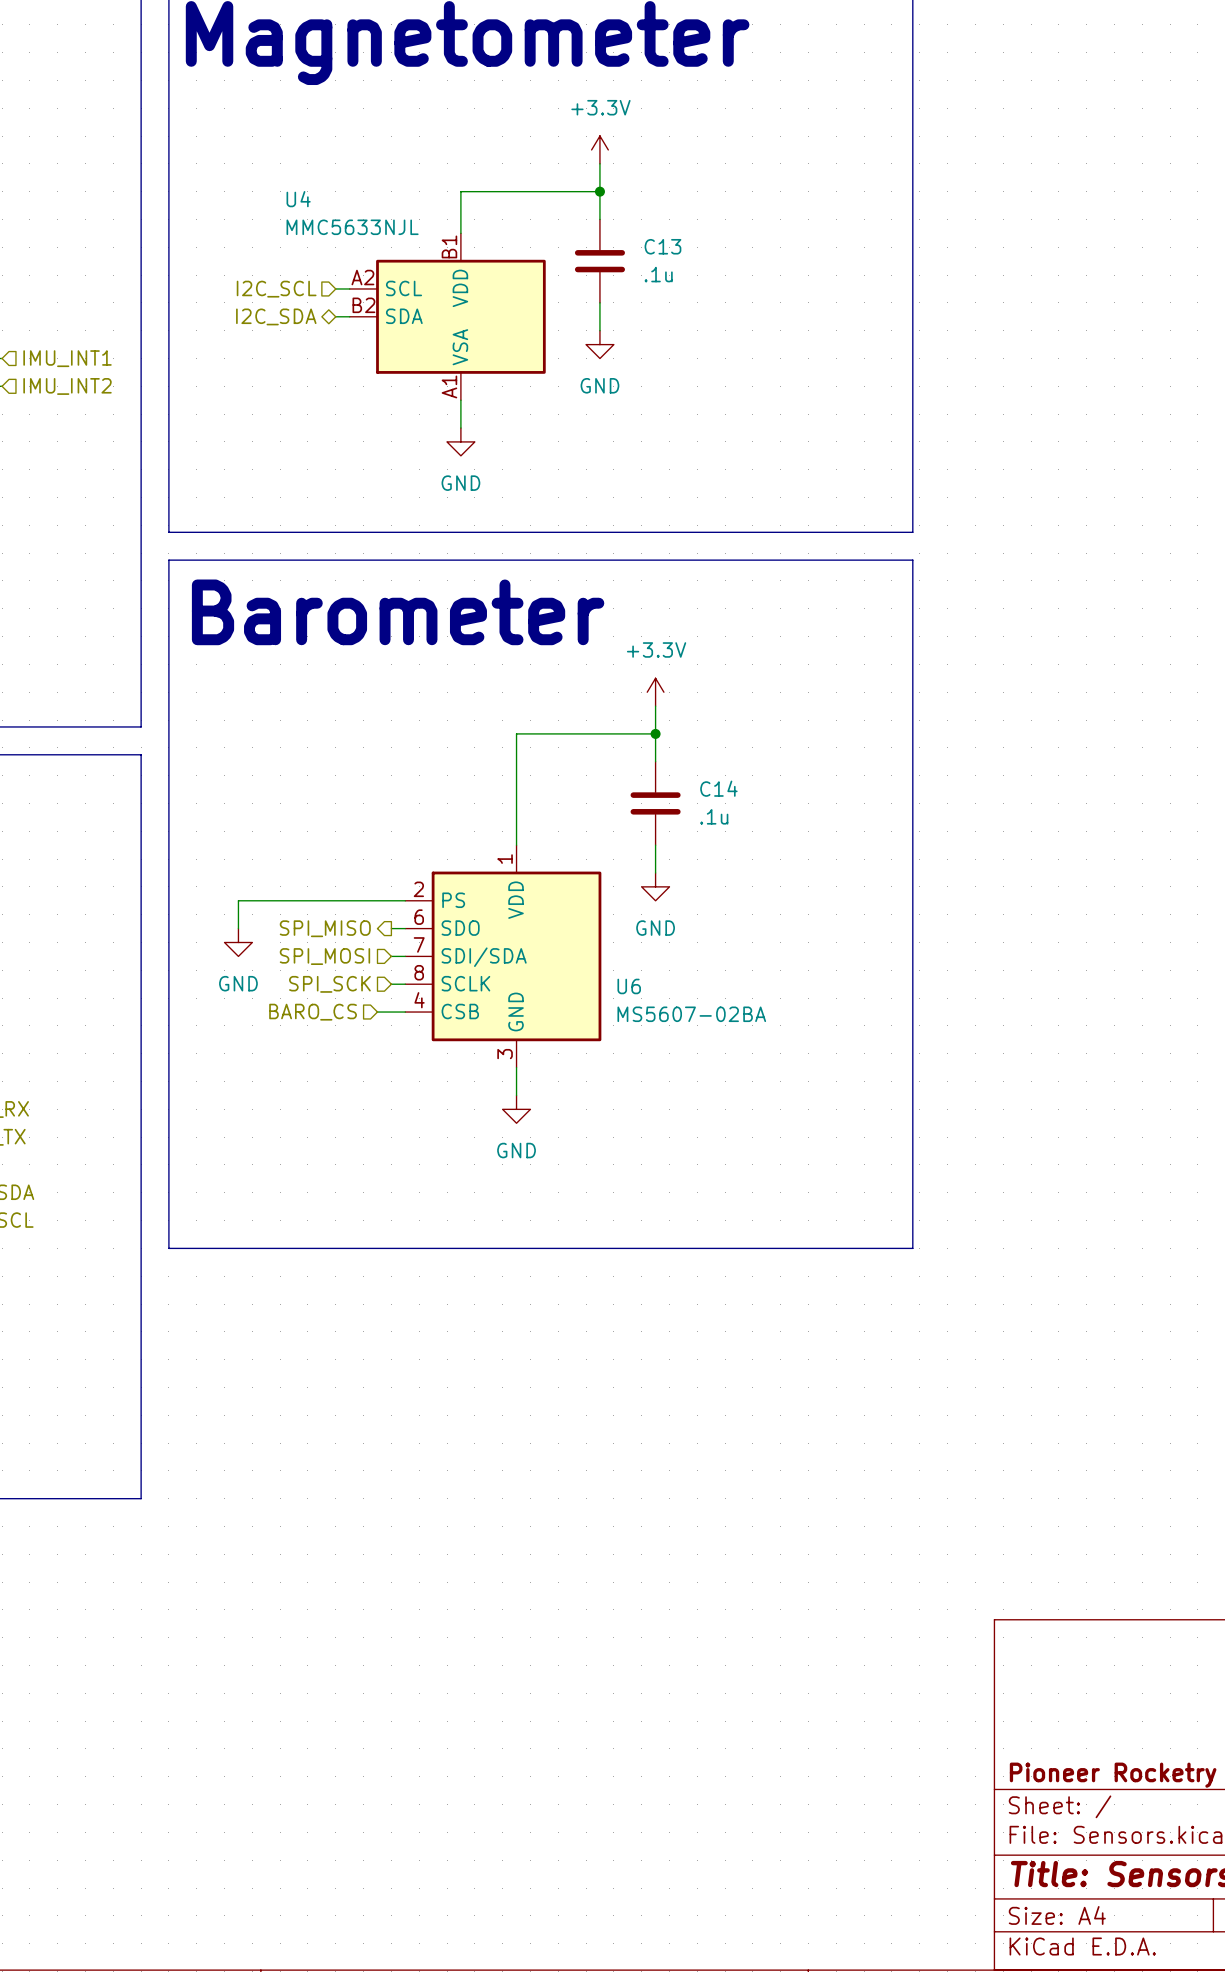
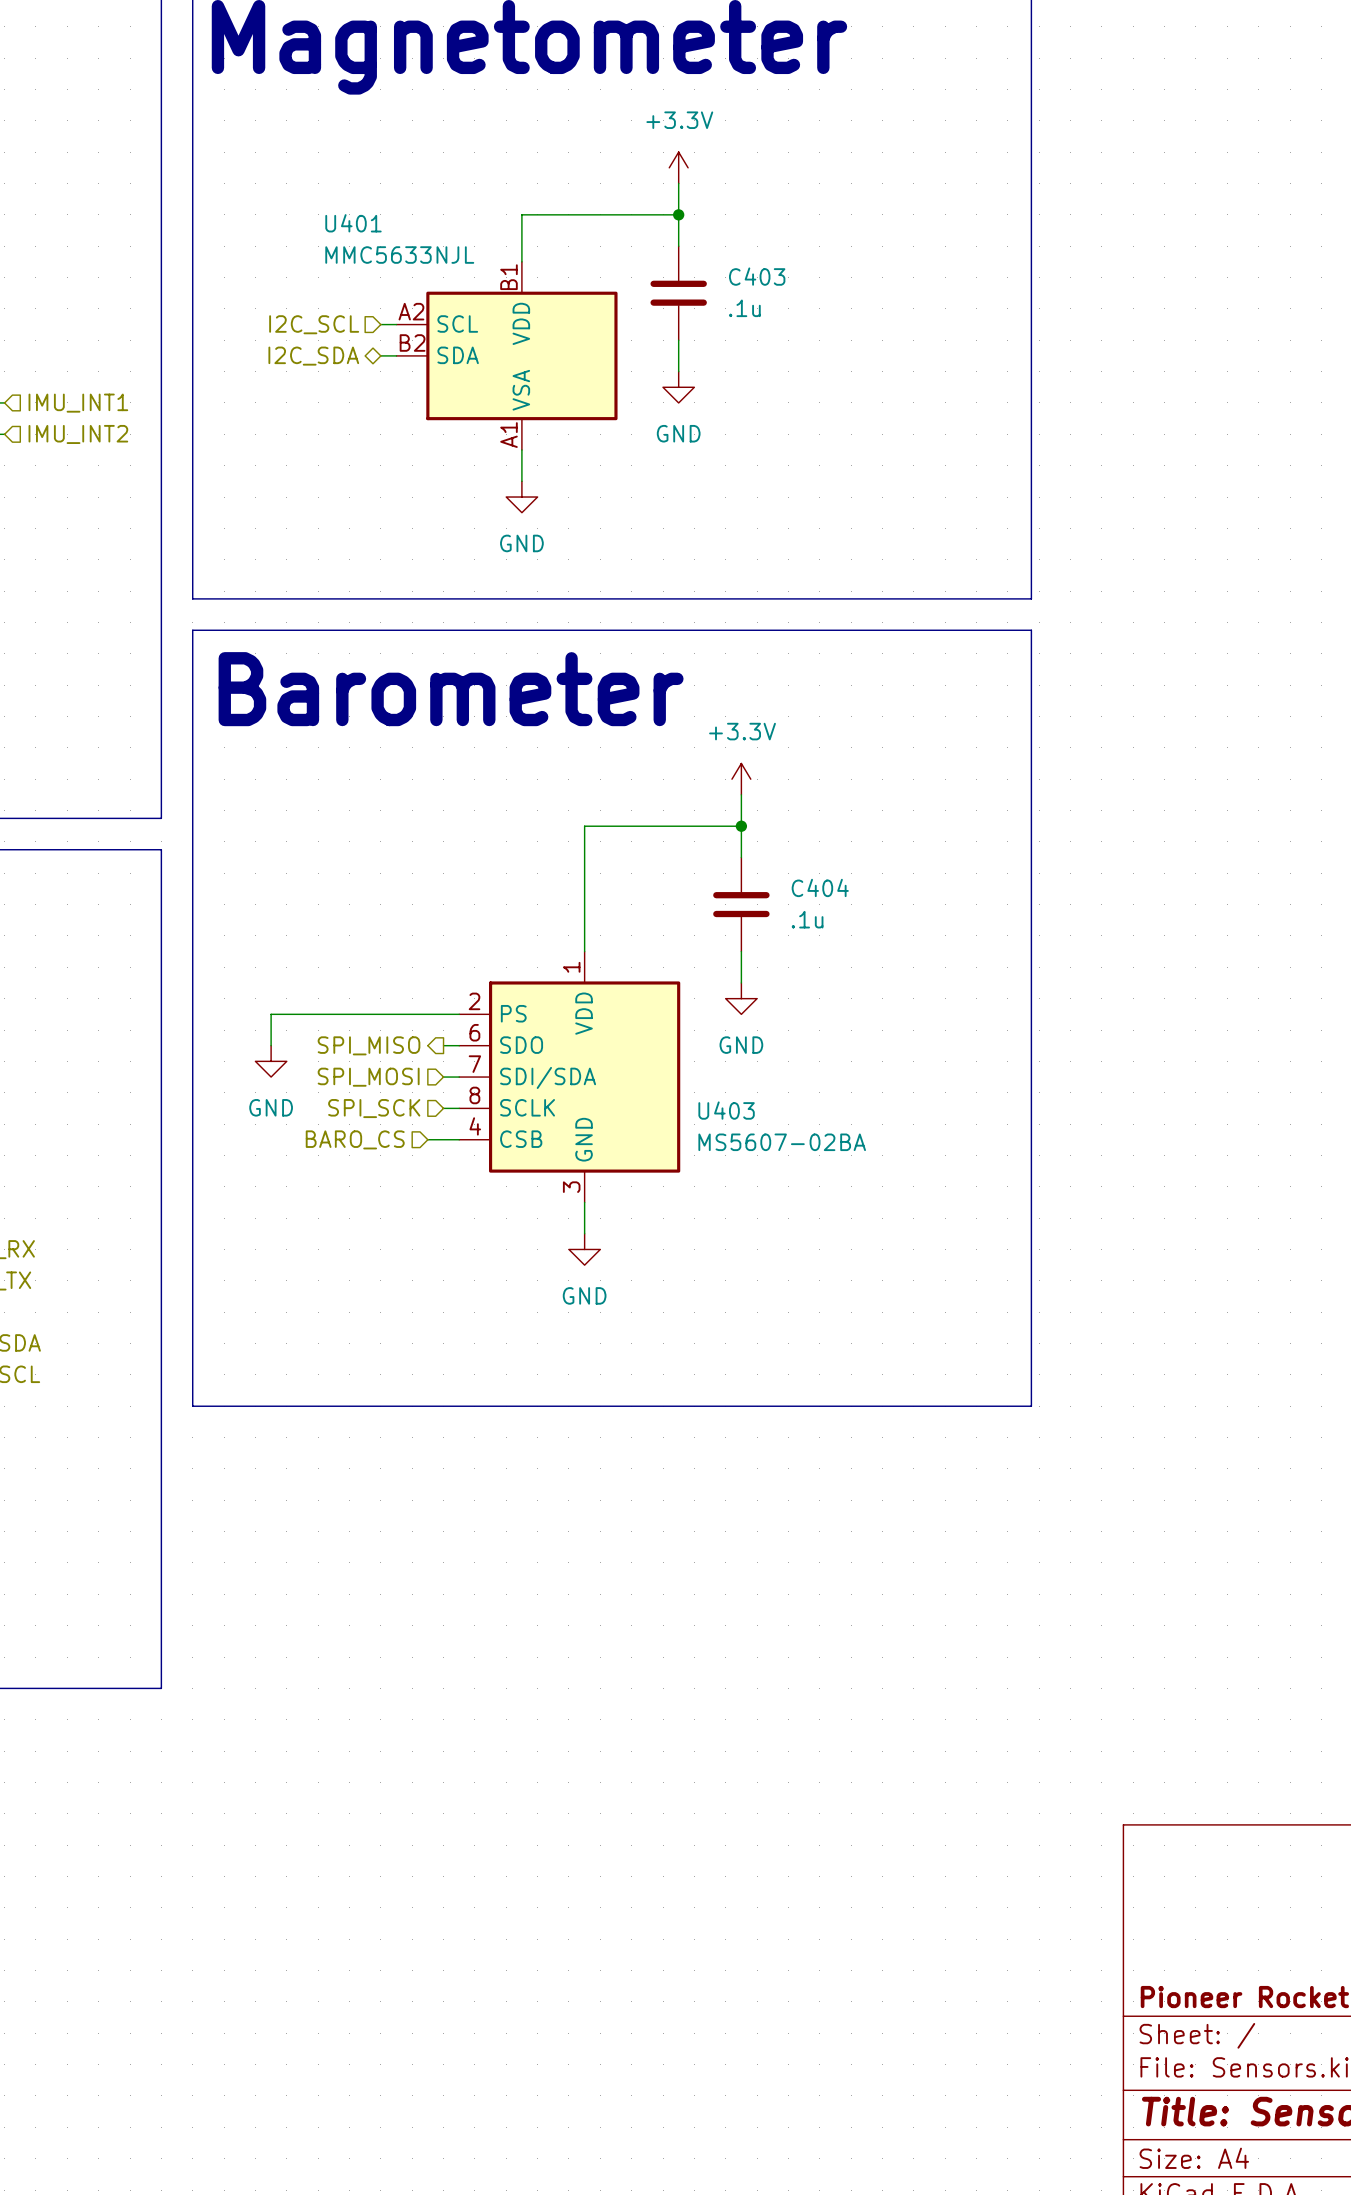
U4 name: U4 (298, 199) -> U401 (353, 223)
C13 name: C13 (662, 246) -> C403 (757, 276)
C14 name: C14 (718, 788) -> C404 (820, 887)
U6 name: U6 (629, 986) -> U403 (726, 1110)

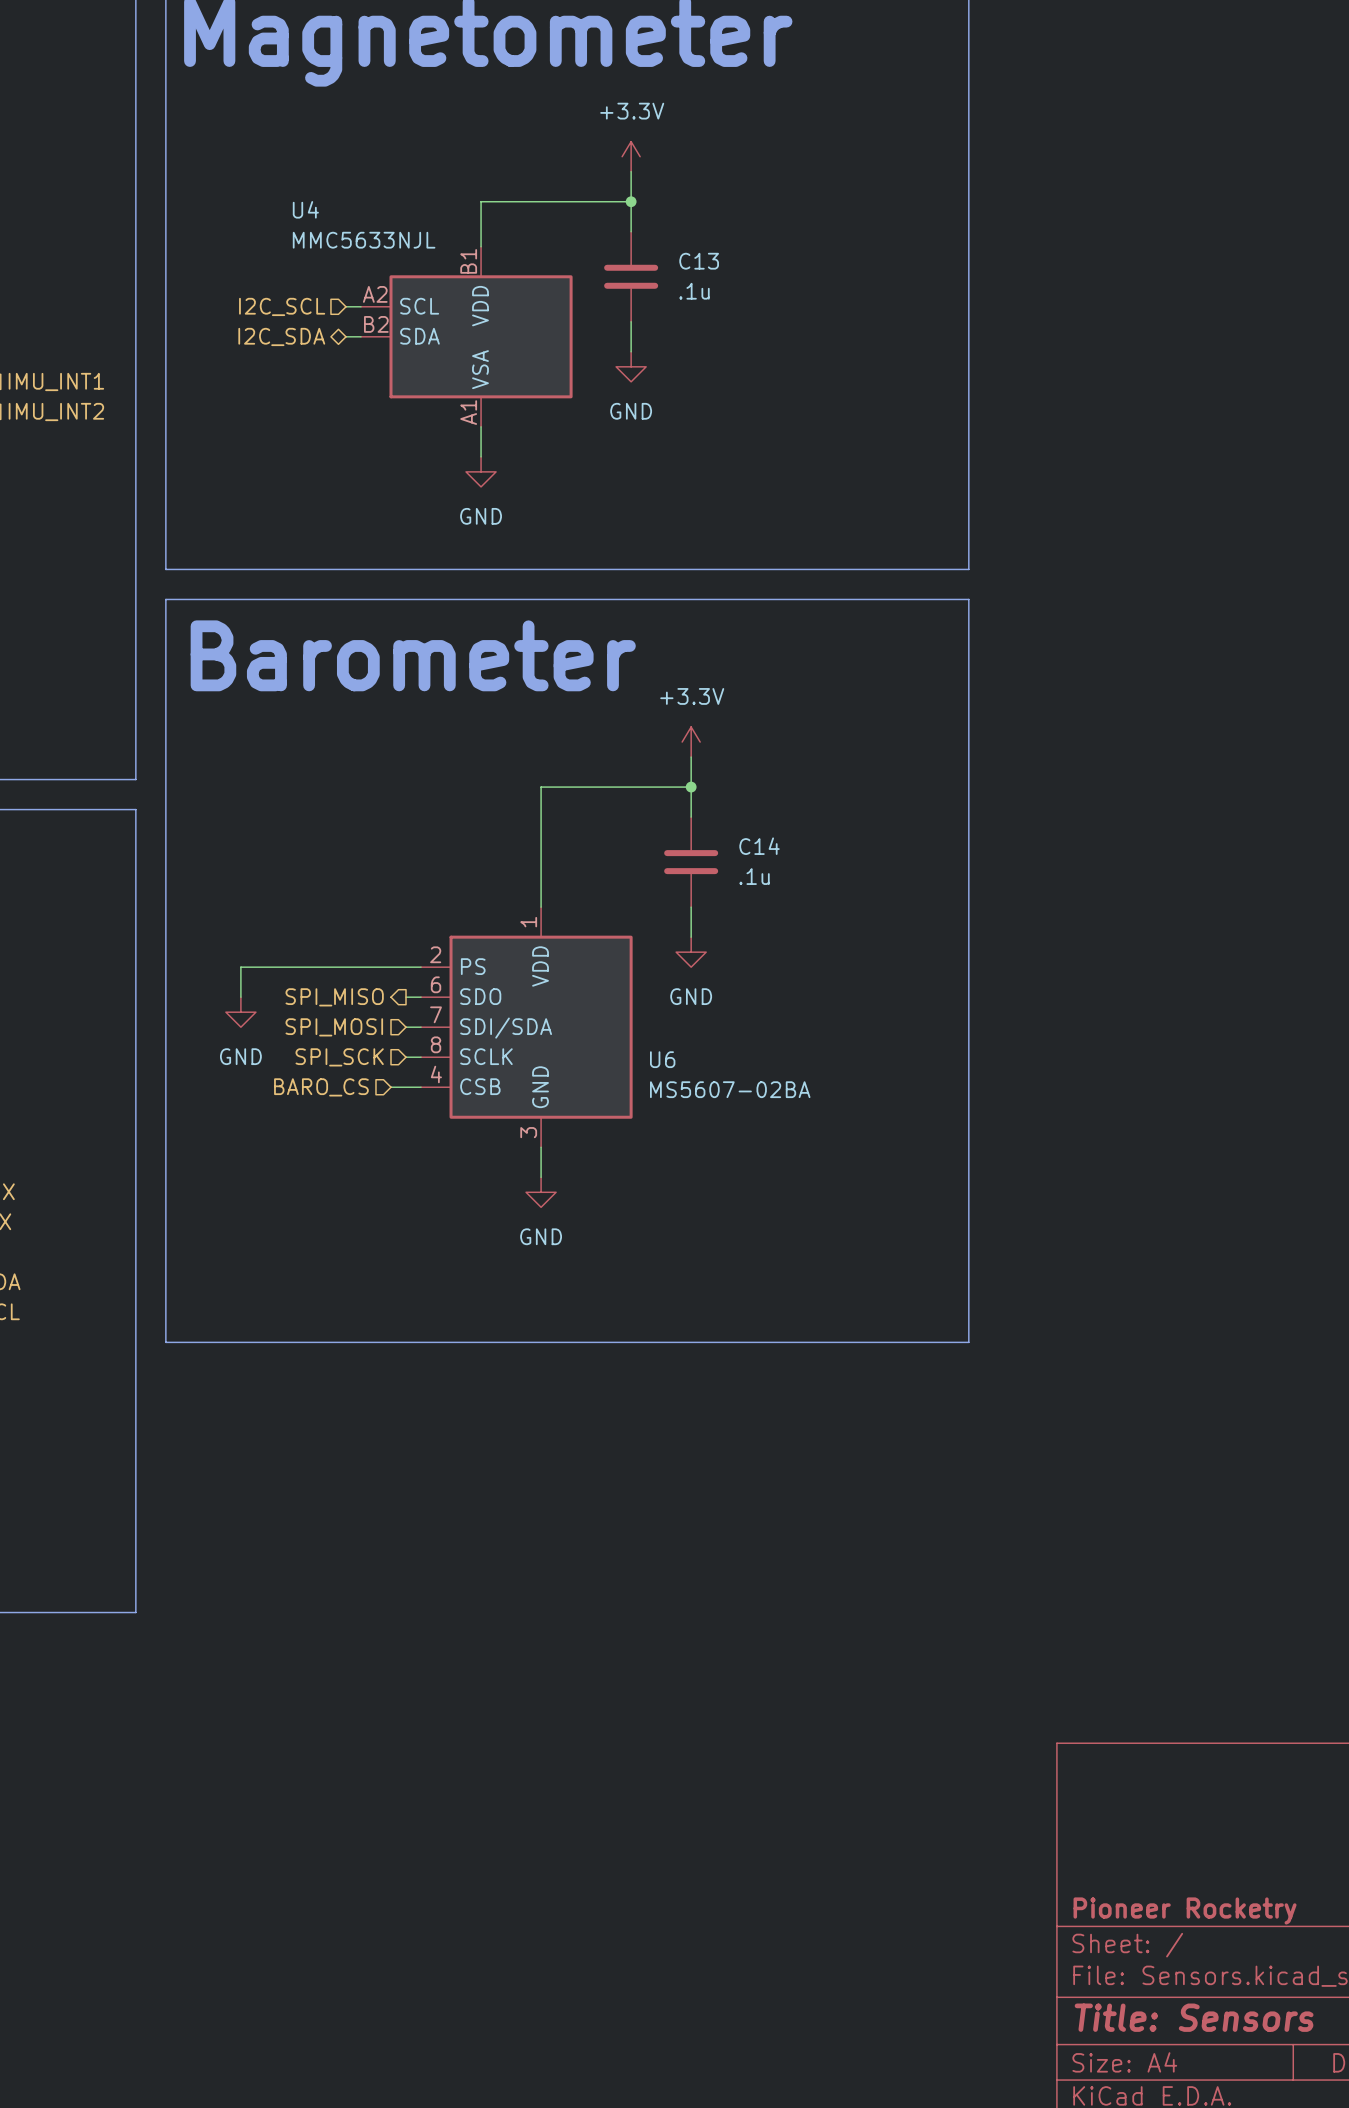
U401 name: U401 (353, 223) -> U4 (305, 209)
C403 name: C403 (757, 276) -> C13 (699, 261)
C404 name: C404 (820, 887) -> C14 (759, 846)
U403 name: U403 (726, 1110) -> U6 (662, 1059)

